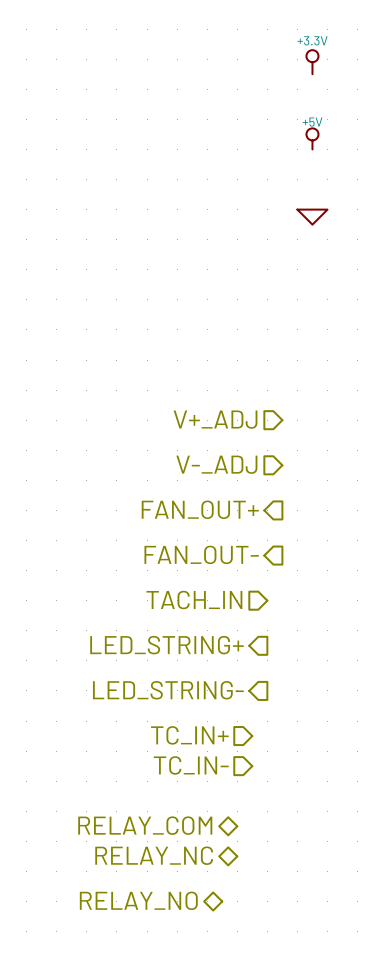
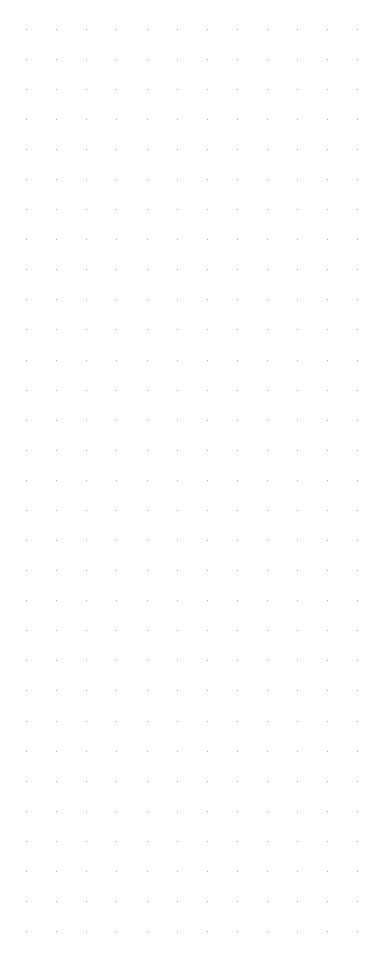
power symbol: +3.3V (312, 62) -> none
power symbol: +5V (312, 138) -> none
power symbol: (312, 217) -> none
hierarchical label: V+_ADJ (215, 419) -> none
hierarchical label: V-_ADJ (216, 464) -> none
hierarchical label: FAN_OUT+ (200, 509) -> none
hierarchical label: FAN_OUT- (201, 554) -> none
hierarchical label: TACH_IN (194, 600) -> none
hierarchical label: LED_STRING+ (167, 645) -> none
hierarchical label: LED_STRING- (168, 690) -> none
hierarchical label: TC_IN+ (189, 735) -> none
hierarchical label: TC_IN- (191, 765) -> none
hierarchical label: RELAY_COM (145, 825) -> none
hierarchical label: RELAY_NC (154, 855) -> none
hierarchical label: RELAY_NO (138, 900) -> none

